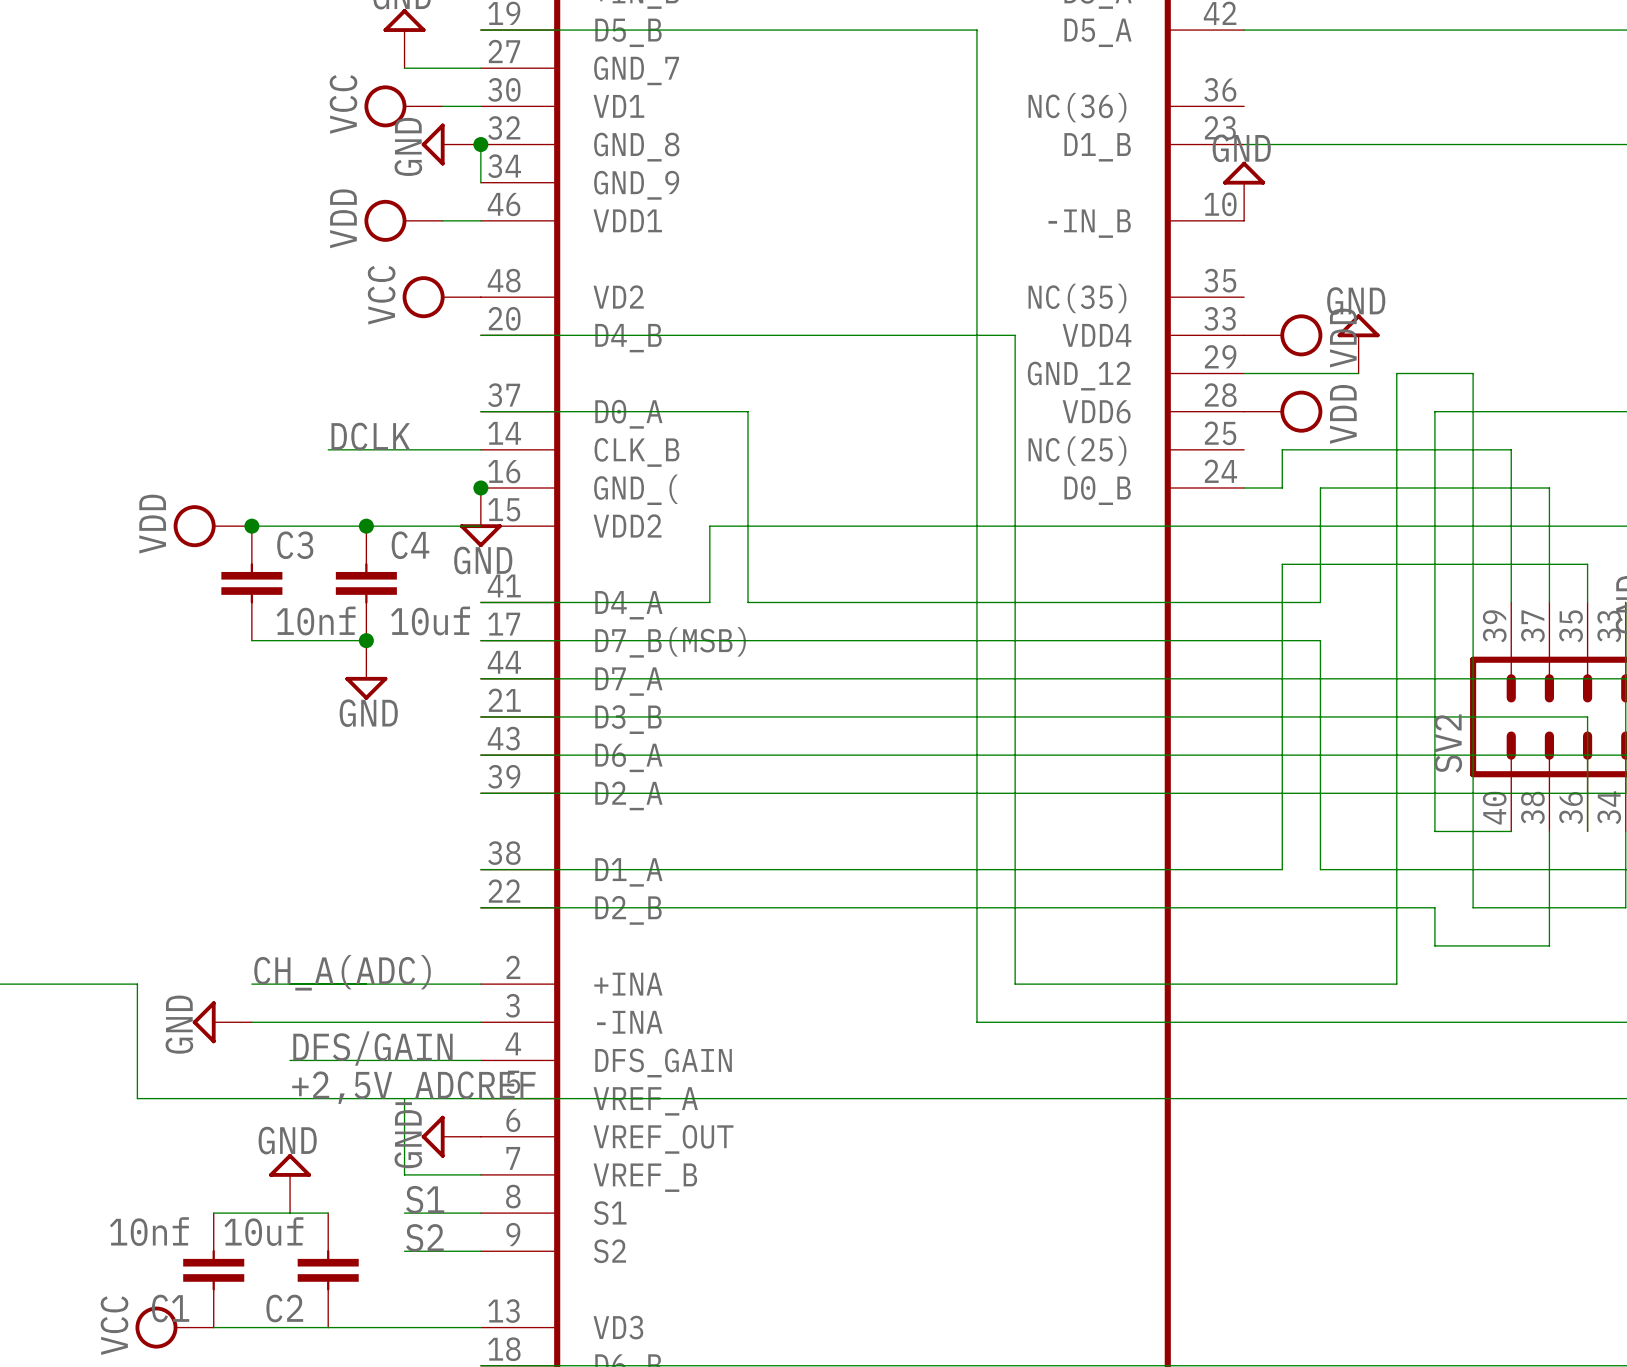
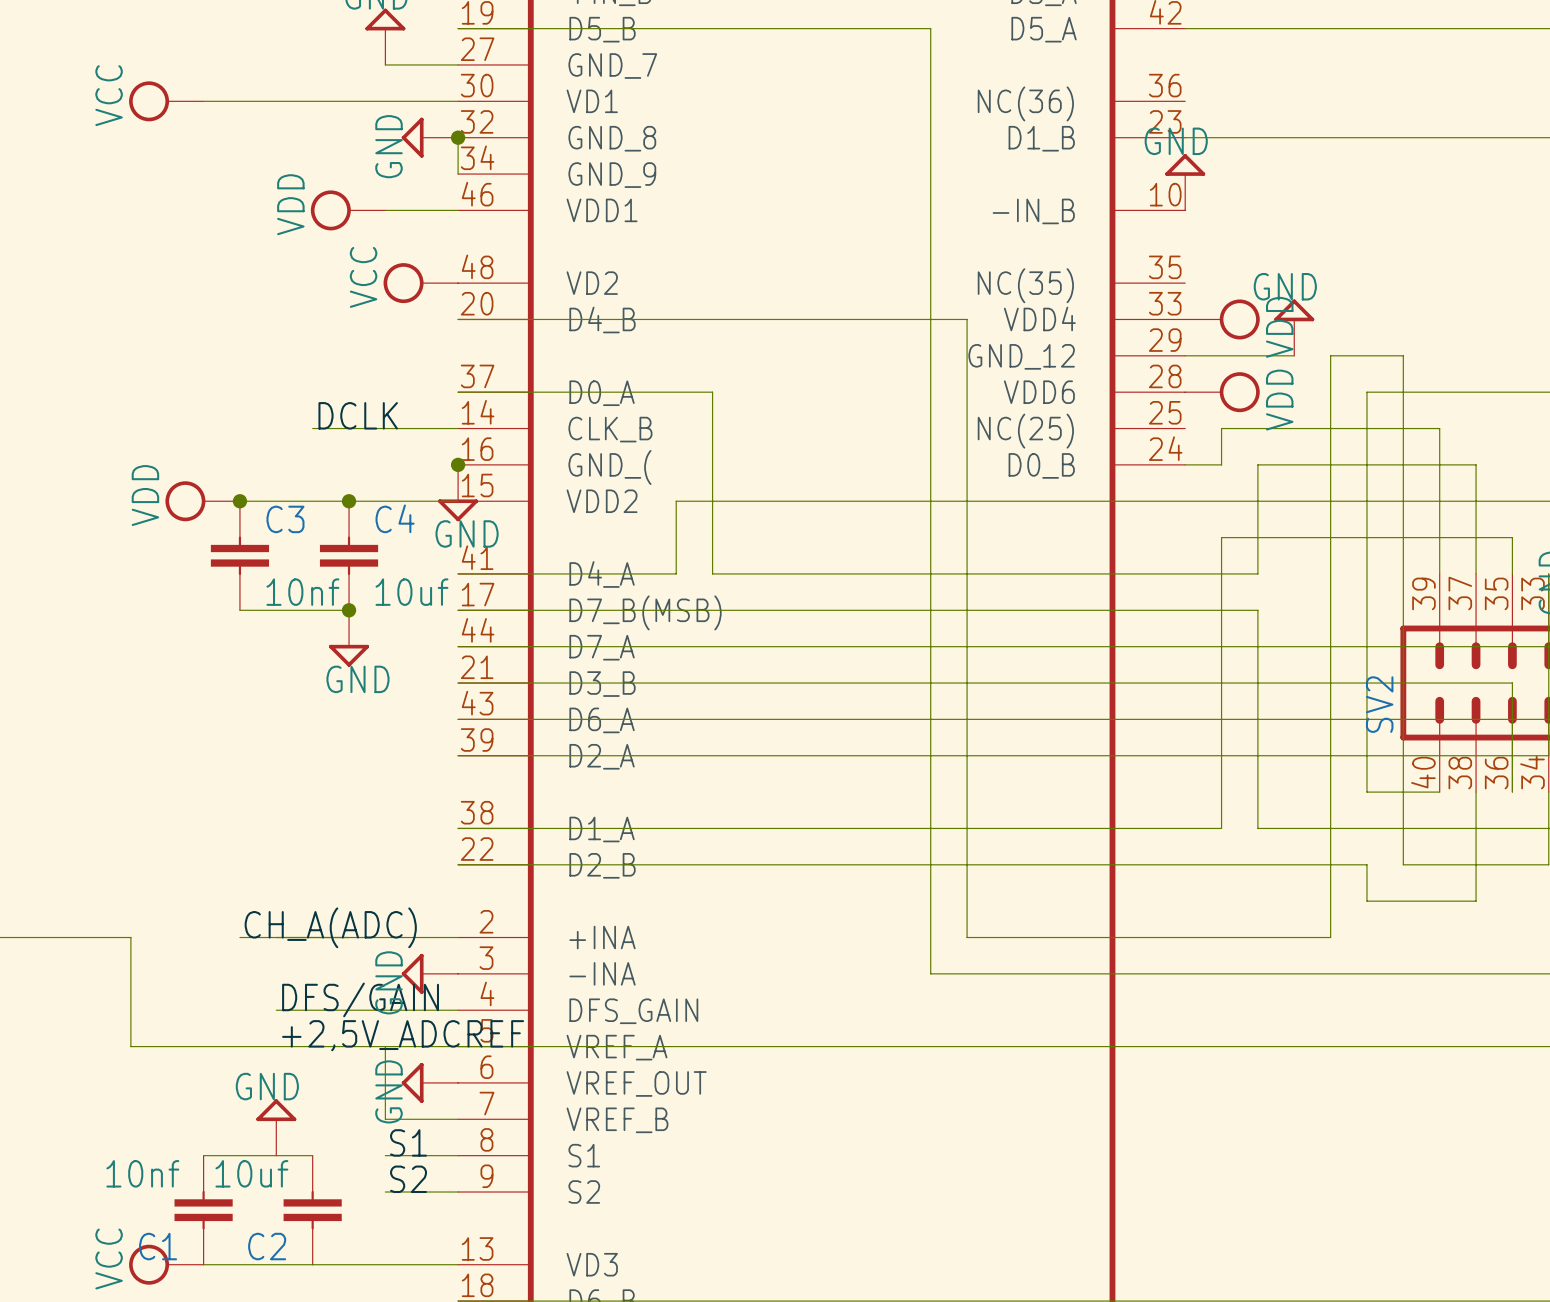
wire: none -> (203, 101) (421, 101)
power symbol position: VCC (403, 106) -> VCC (166, 101)
power symbol position: VDD (403, 220) -> VDD (348, 210)
power symbol position: GND (222, 1022) -> GND (429, 973)
wire: (251, 1022) (480, 1022) -> none

